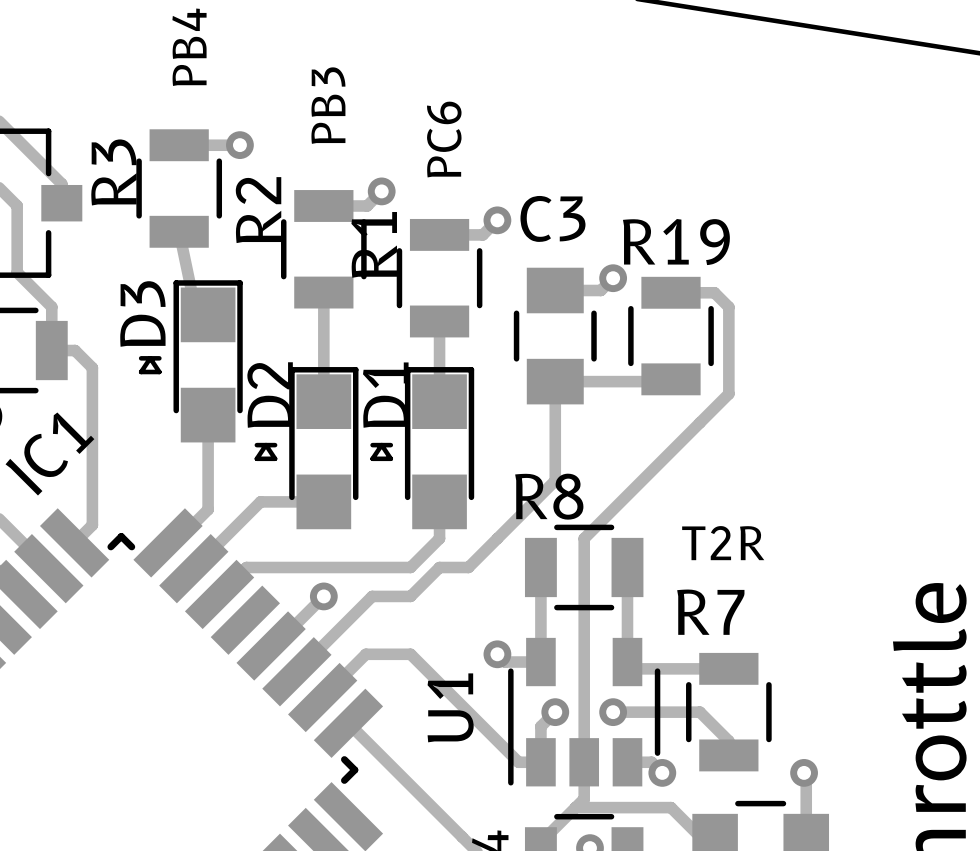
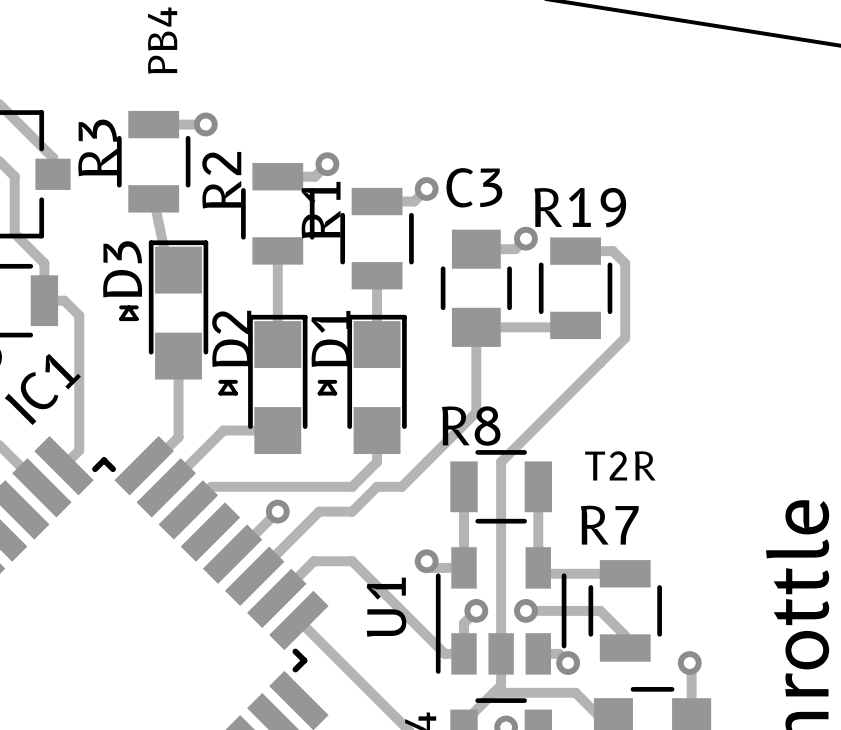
text: PB3 (328, 105) -> none
text: PC6 (444, 139) -> none

